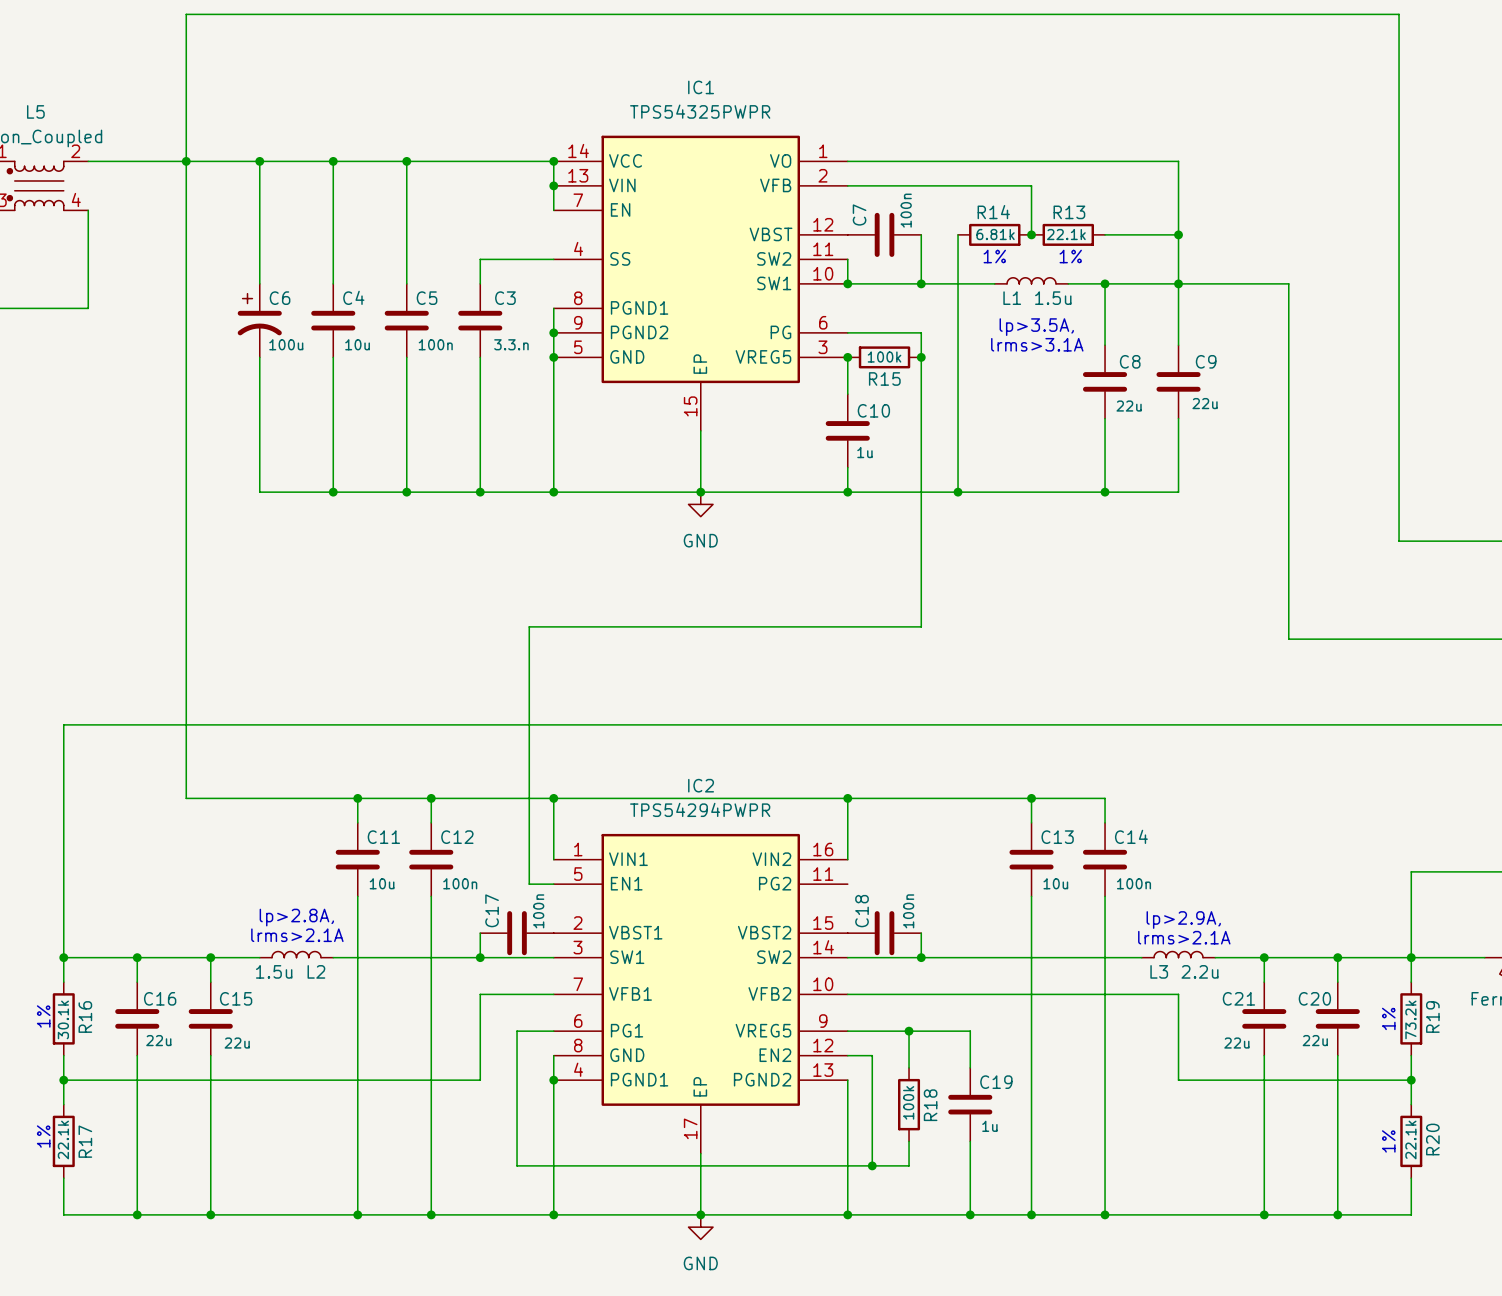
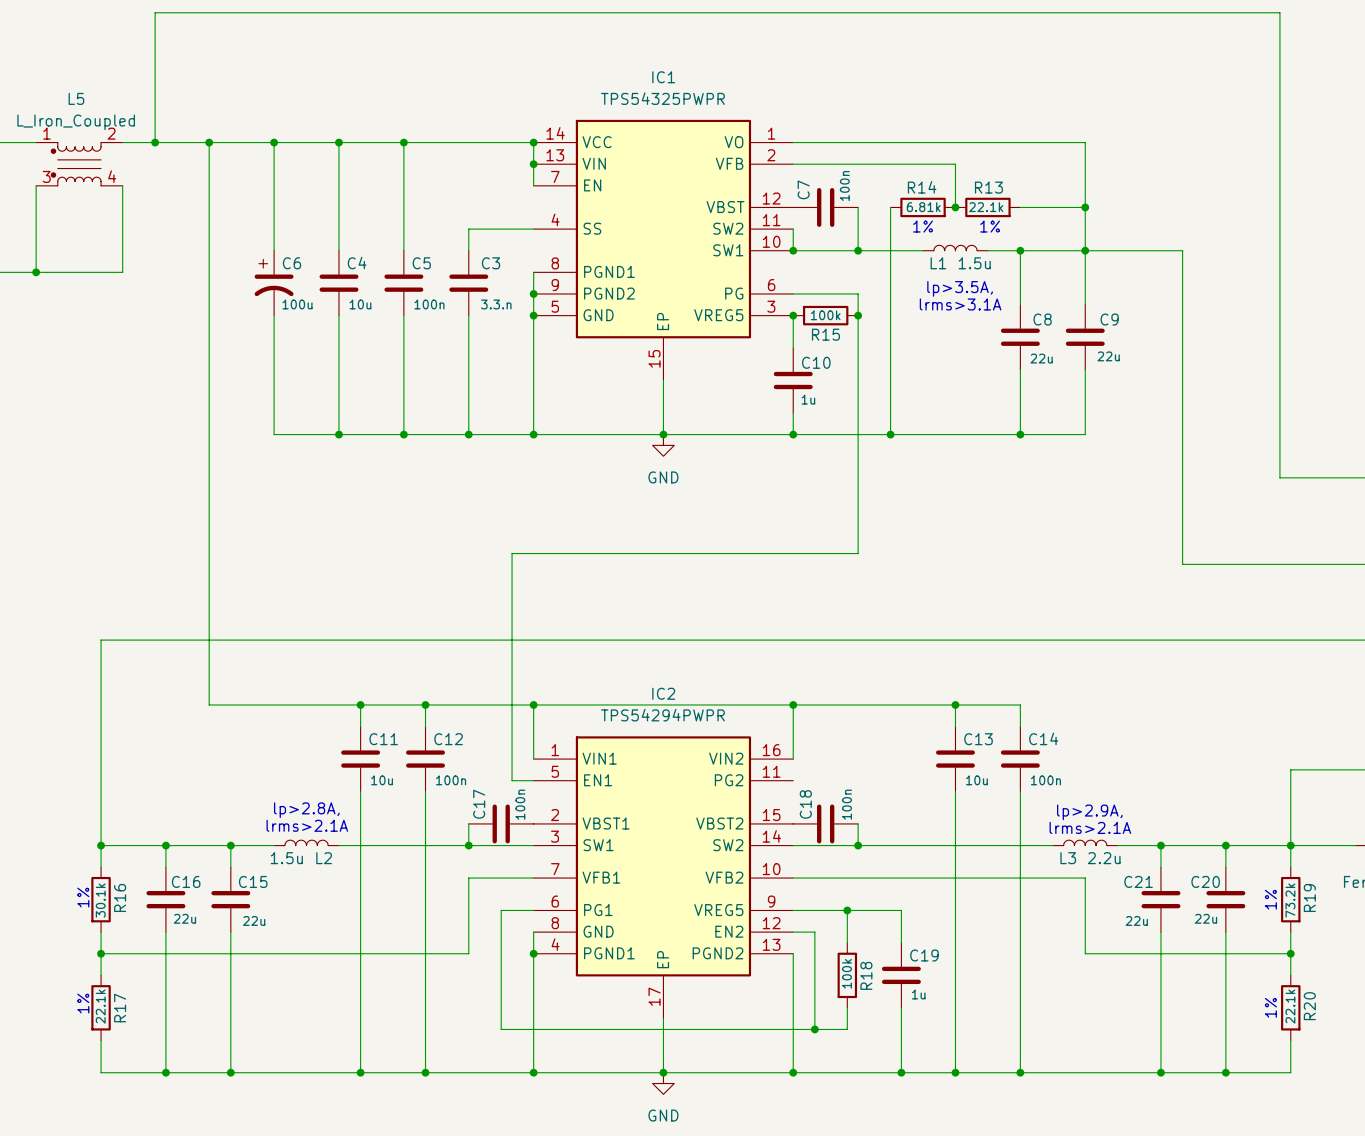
wire: (186, 14) (186, 161) -> (209, 12) (155, 12) (155, 142)
junction: none -> (155, 142)

